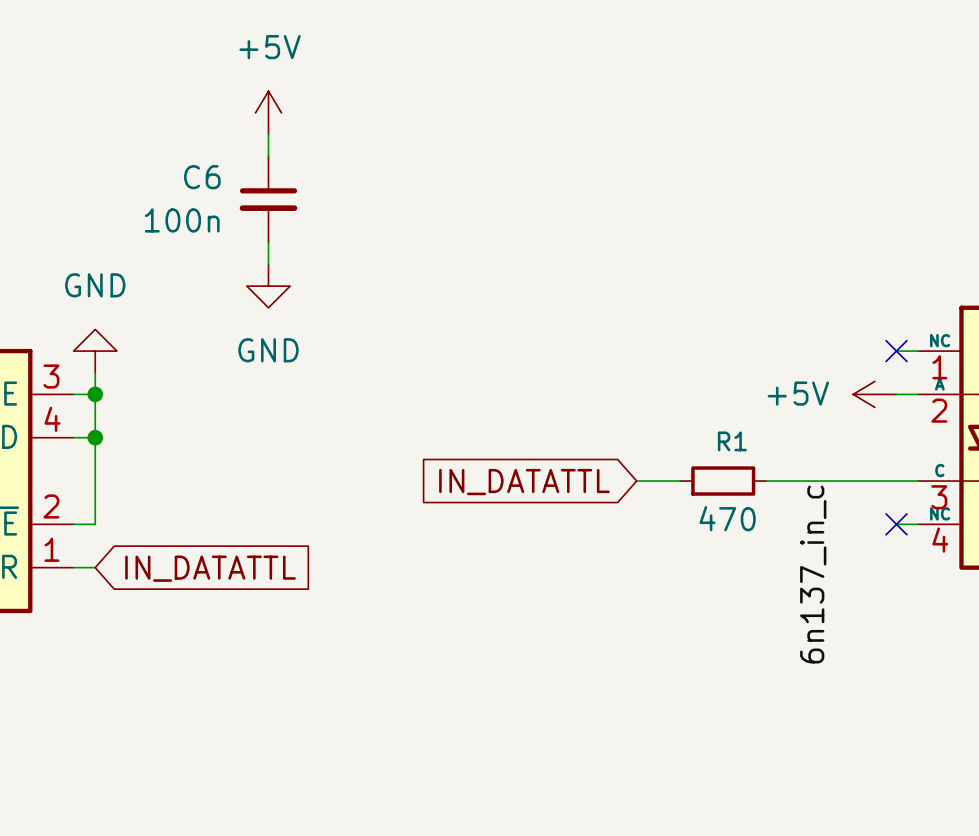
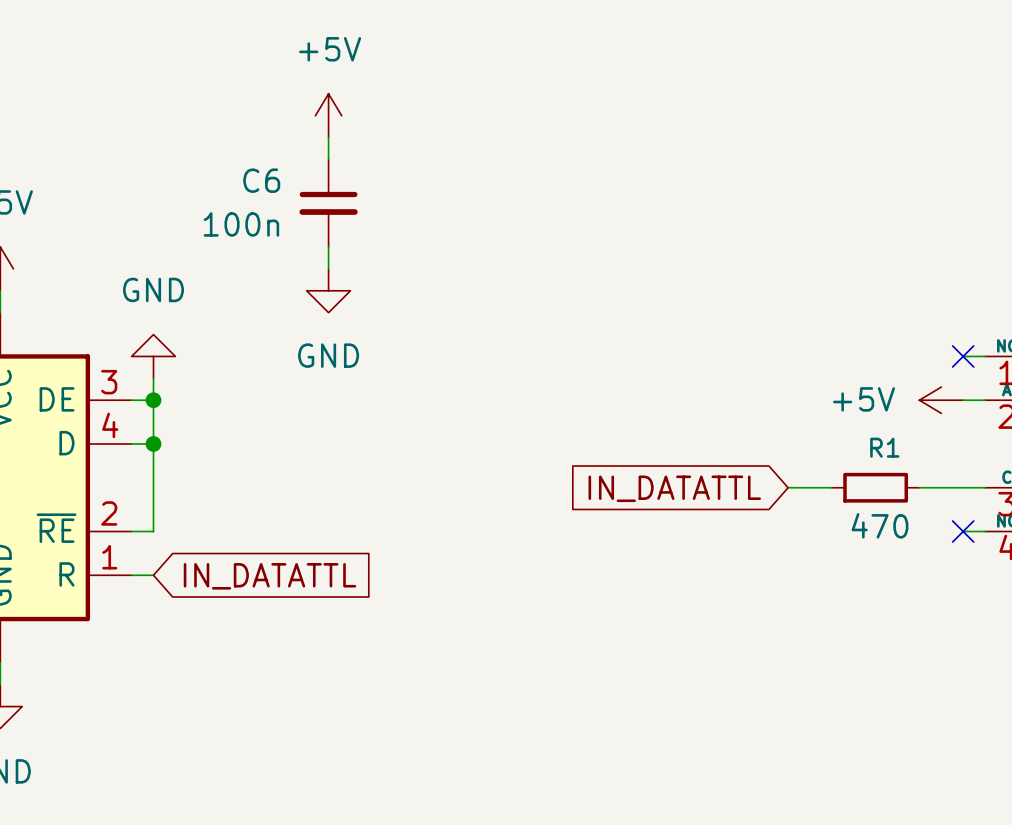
wire: (636, 481) (679, 481) -> none
R1 position: (723, 481) -> (875, 487)
wire: (766, 481) (853, 481) -> (831, 487) (788, 487)
global label position: IN_DATATTL (524, 482) -> IN_DATATTL (674, 488)
label: 6n137_in_c (813, 574) -> none

